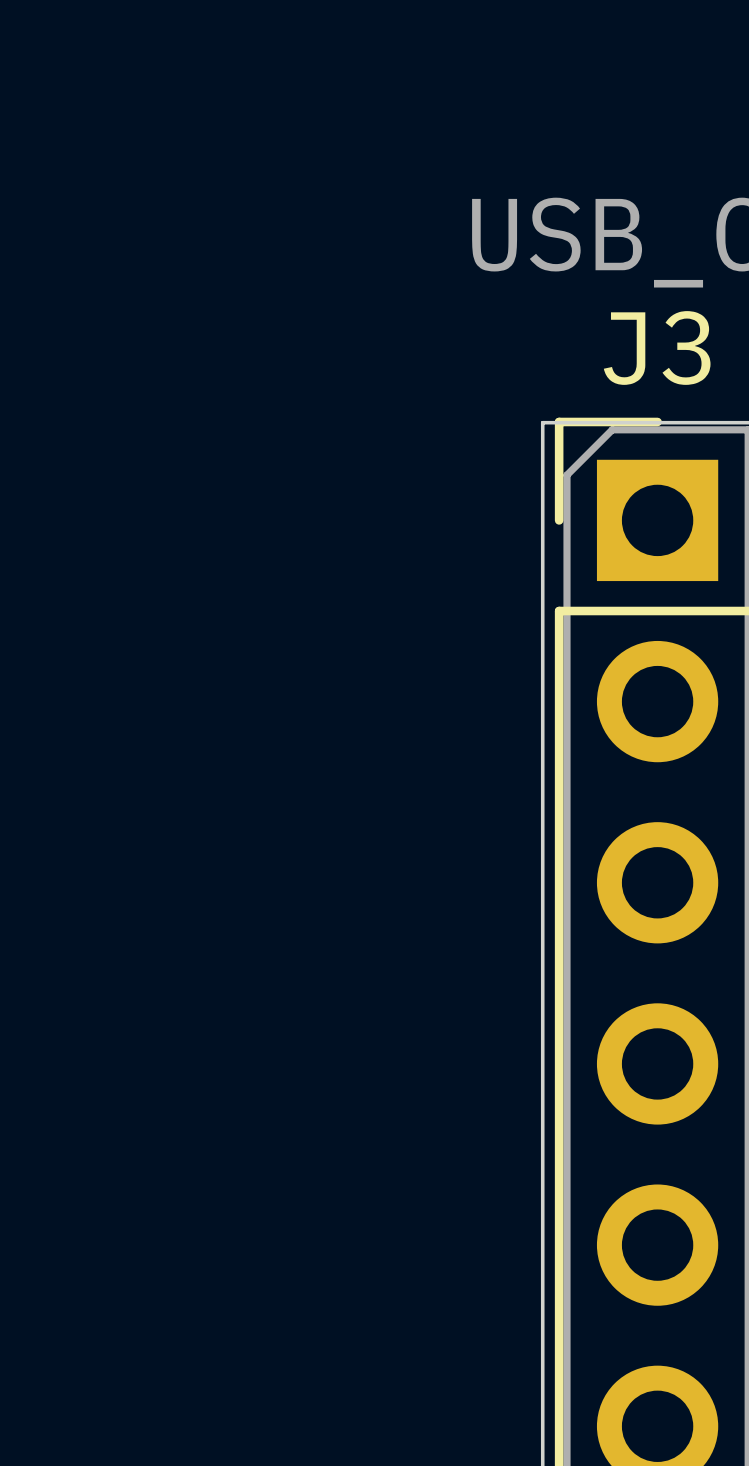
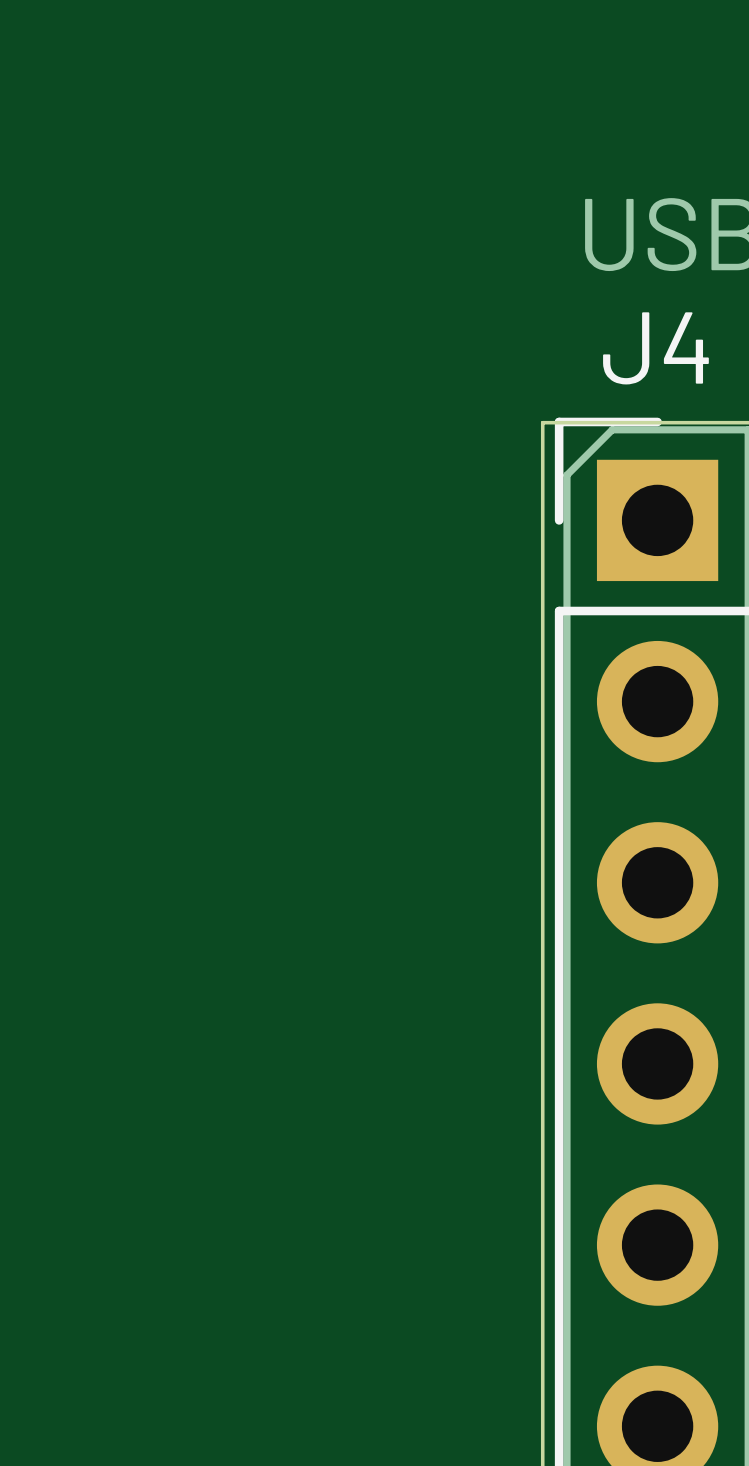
J3 name: J3 (657, 347) -> J4 (655, 348)

